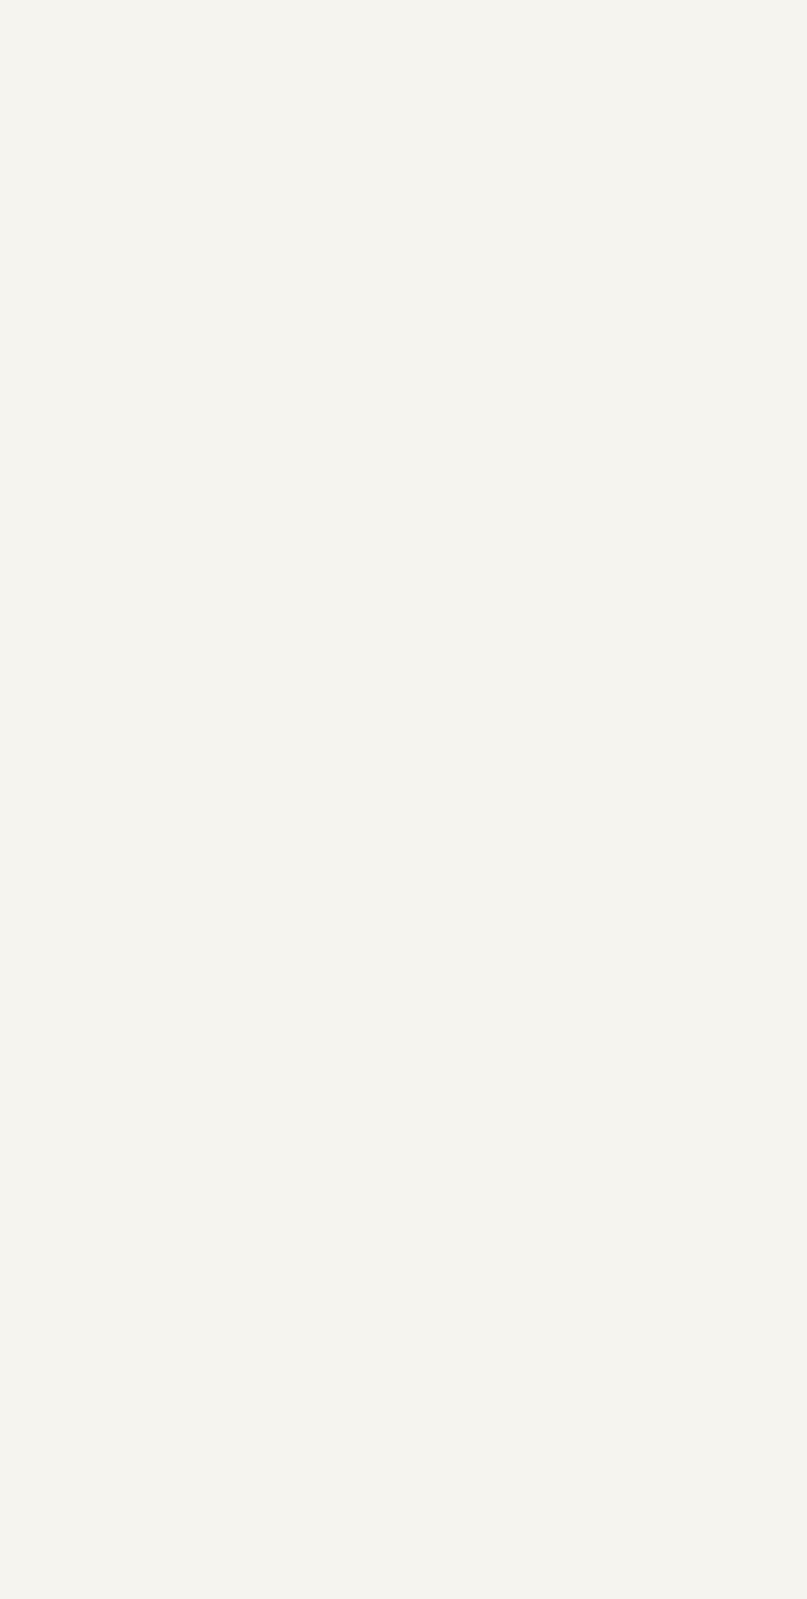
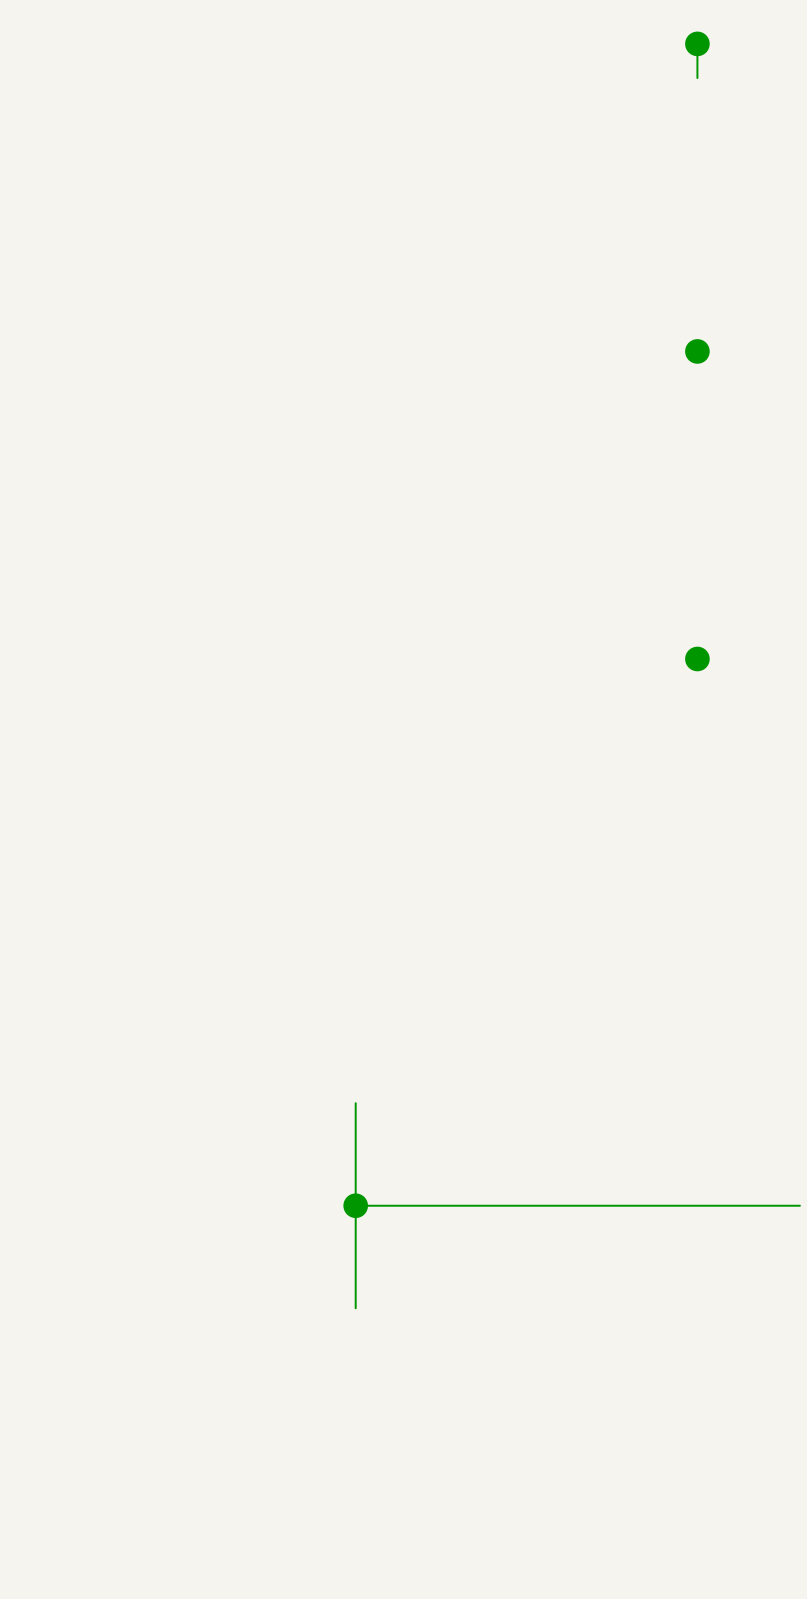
wire: none -> (697, 43) (697, 78)
junction: none -> (697, 43)
junction: none -> (697, 351)
junction: none -> (697, 658)
wire: none -> (355, 1103) (355, 1308)
wire: none -> (355, 1205) (799, 1205)
junction: none -> (355, 1205)

